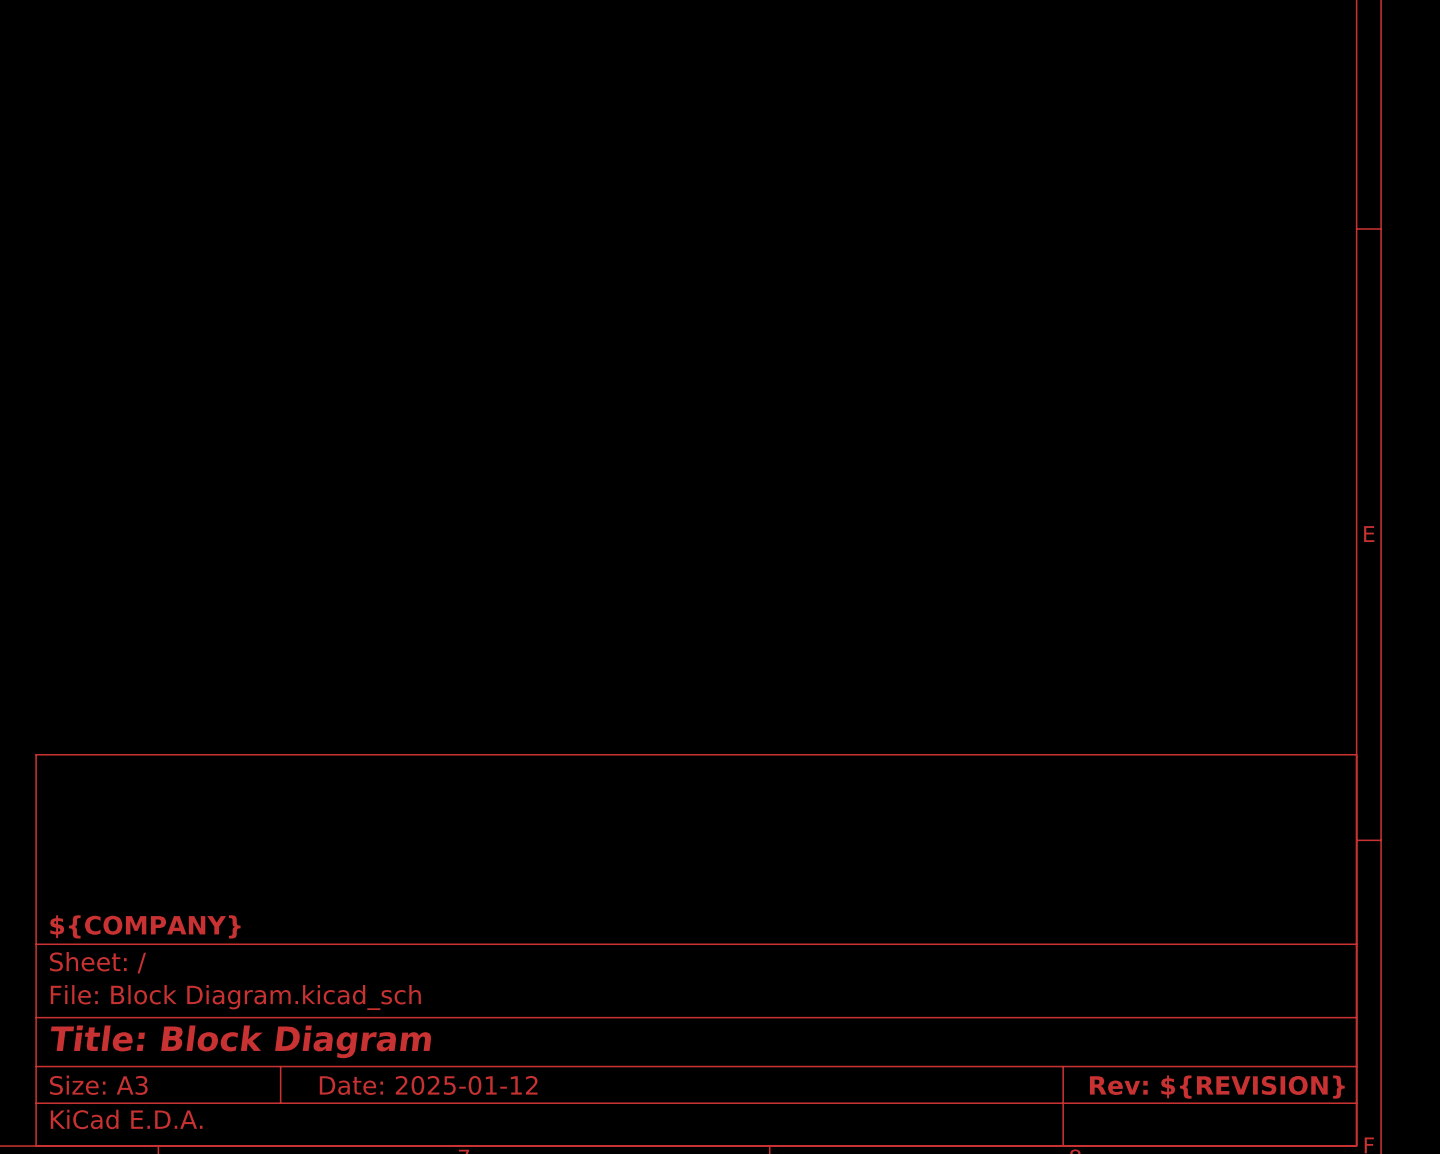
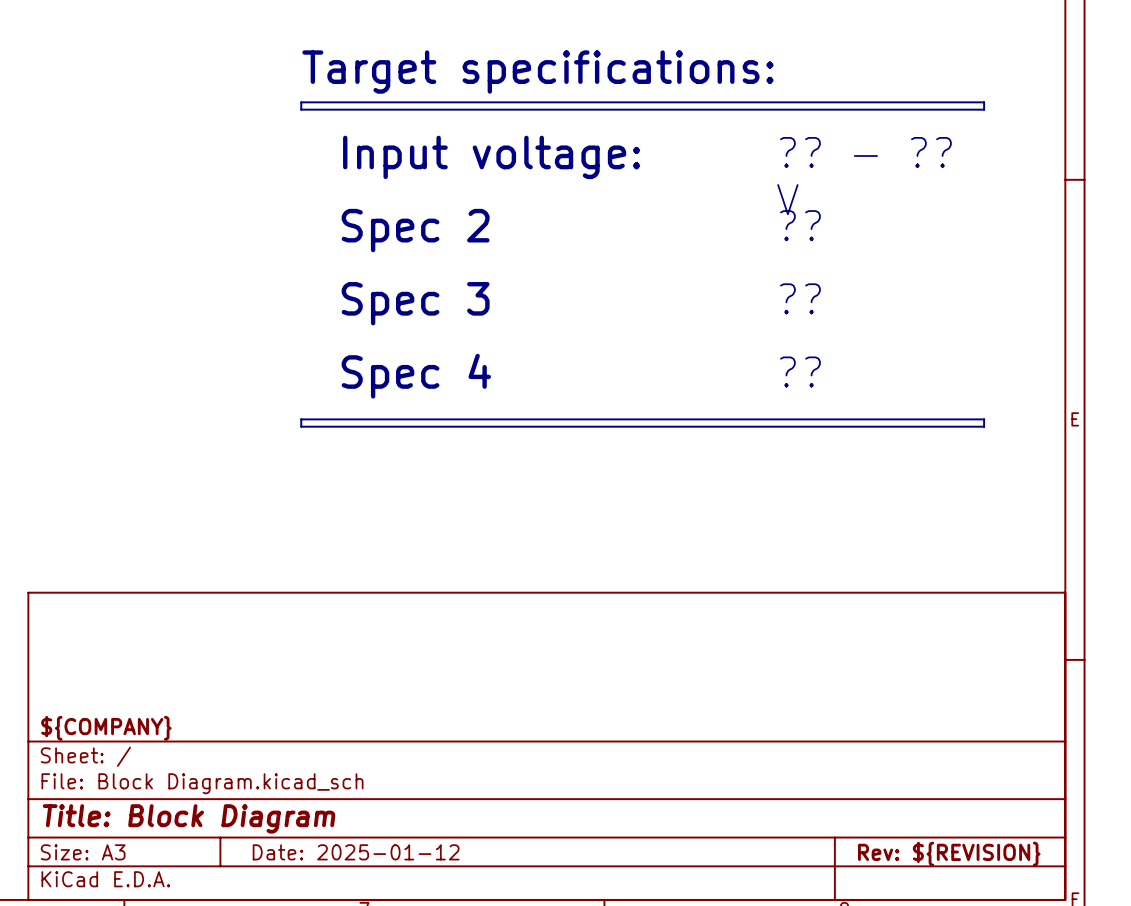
text: none -> Target specifications: (537, 72)
line: none -> (301, 102) (301, 109) (984, 109) (984, 102) (301, 102)
text: none -> ?? - ?? (865, 152)
text: none -> Input voltage: (491, 157)
text: none -> V (787, 199)
text: none -> ?? (800, 225)
text: none -> Spec 2 (415, 230)
text: none -> ?? (800, 298)
text: none -> Spec 3 (415, 303)
text: none -> ?? (800, 372)
text: none -> Spec 4 (416, 376)
line: none -> (301, 419) (984, 419) (984, 426) (301, 426) (301, 419)

